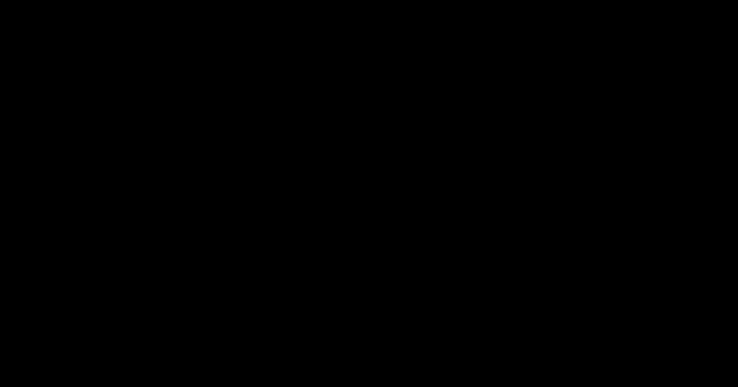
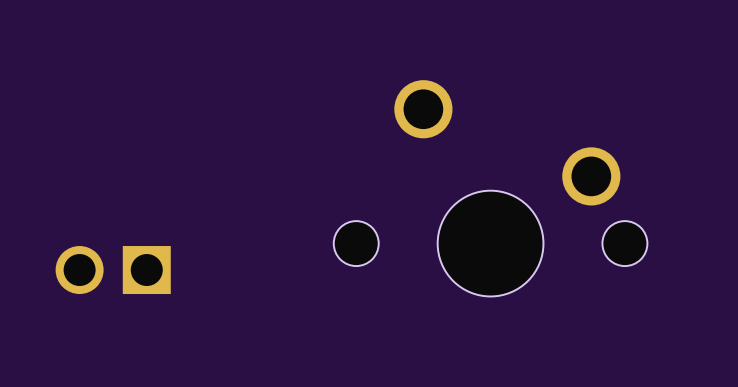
part: none -> (490, 188)
part: none -> (113, 270)

